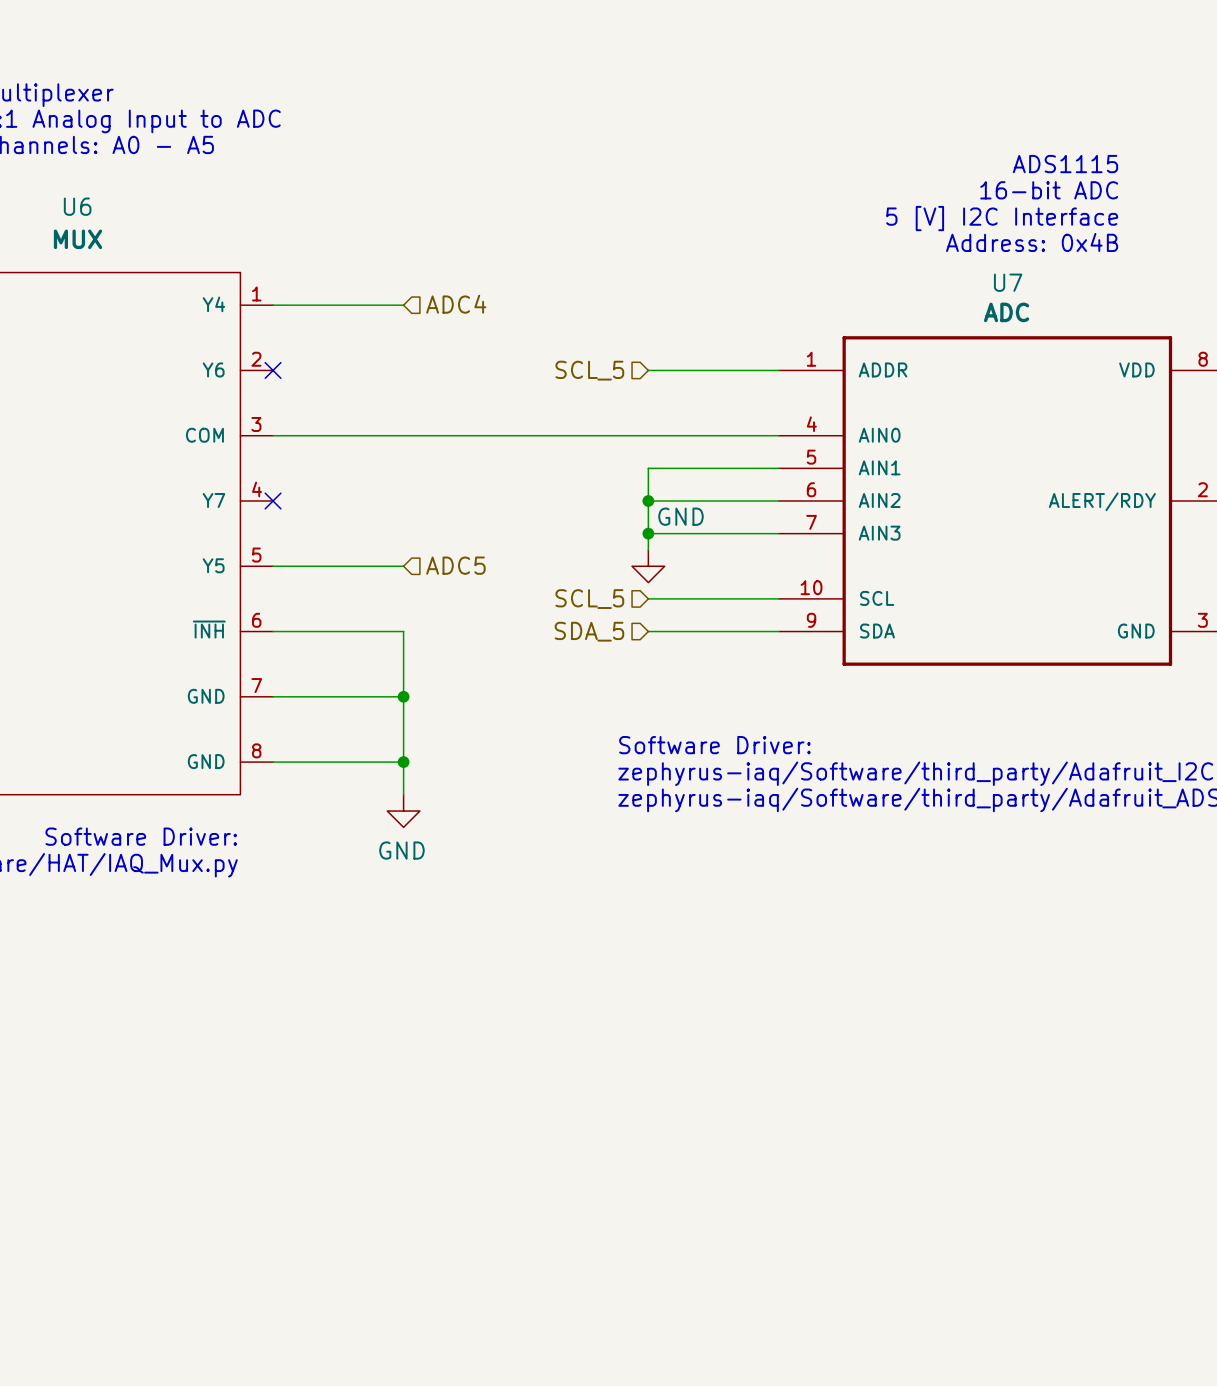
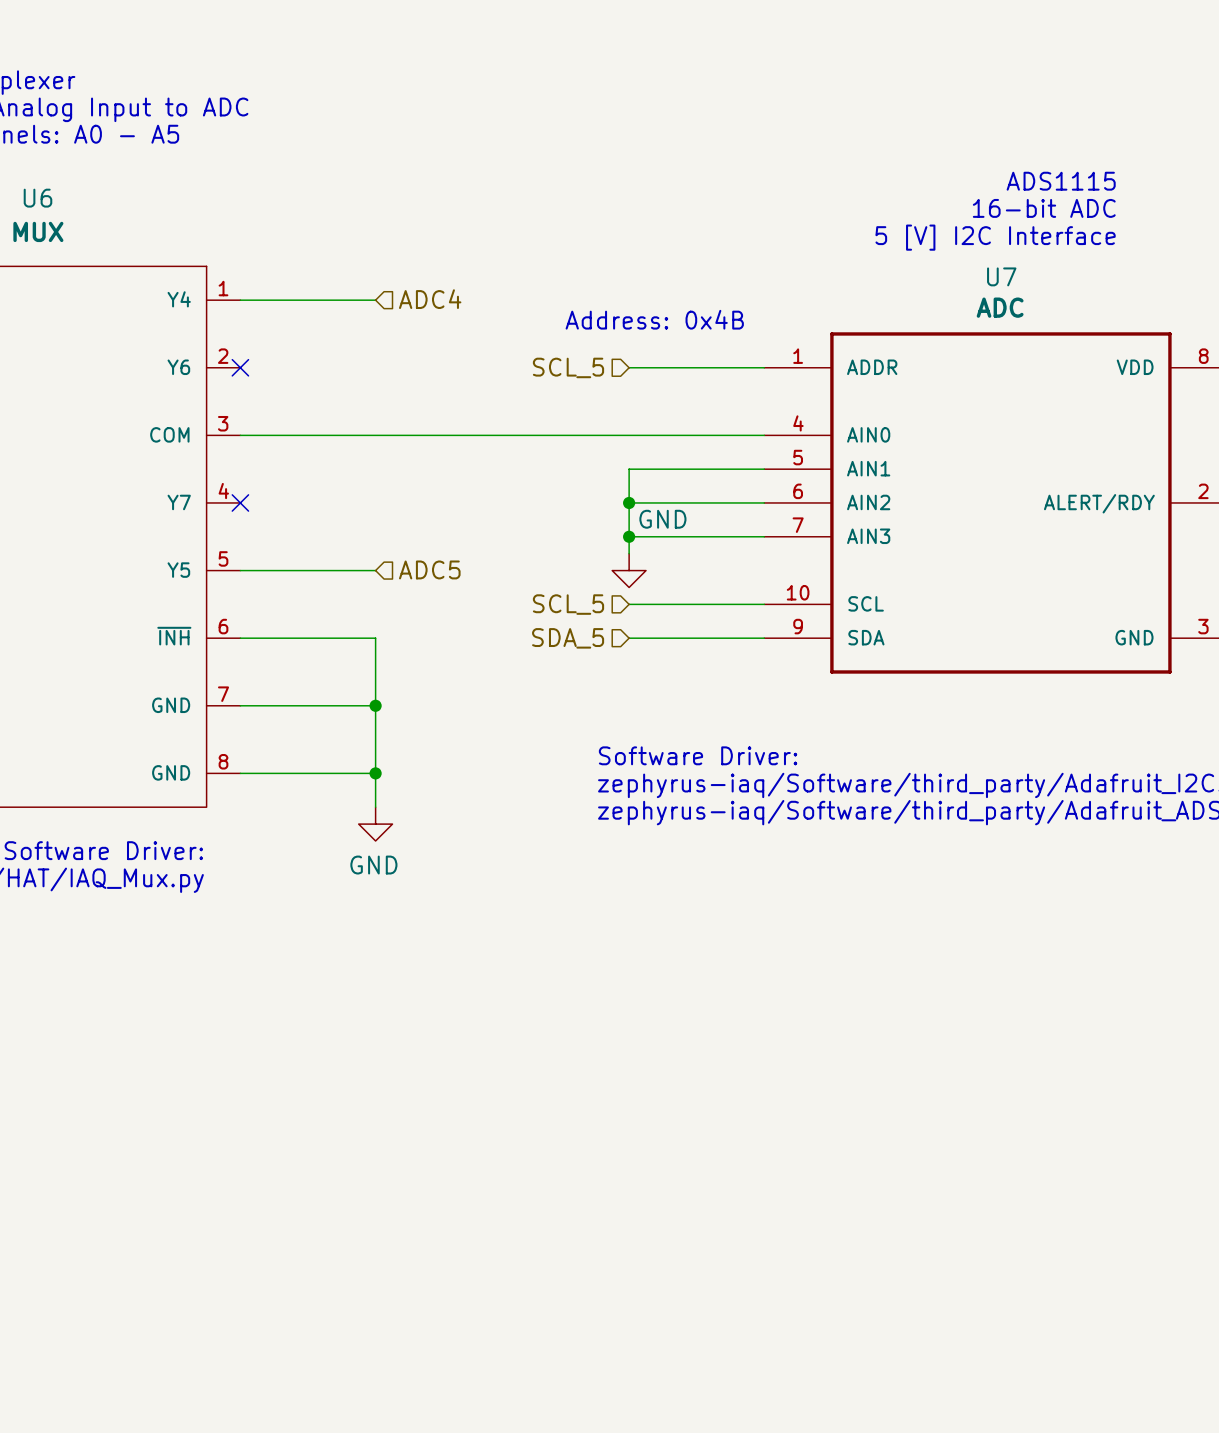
text: ADS1115 (1065, 164) -> none
text: 16-bit ADC (1049, 190) -> ADS1115 (1061, 181)
text: 5 [V] I2C Interface (1002, 218) -> 16-bit ADC (1044, 208)
text: Address: 0x4B (1032, 242) -> 5 [V] I2C Interface (995, 237)
text: none -> Address: 0x4B (654, 319)

